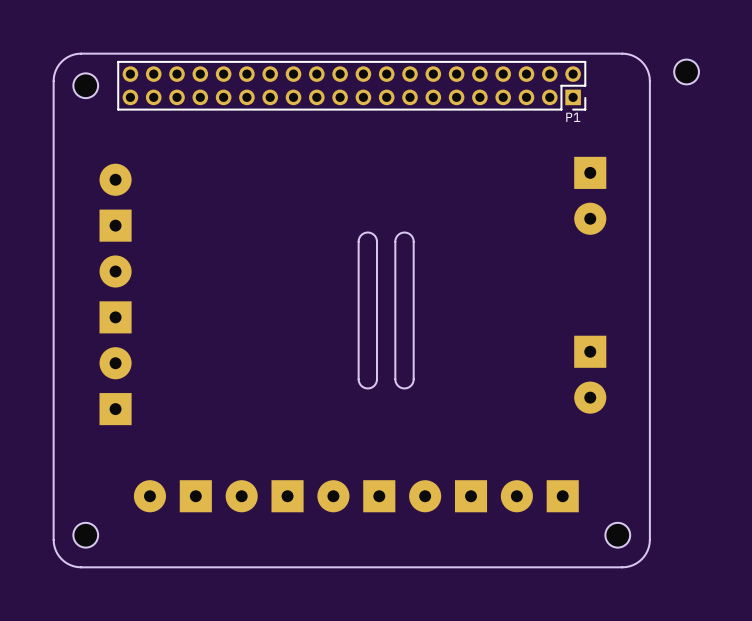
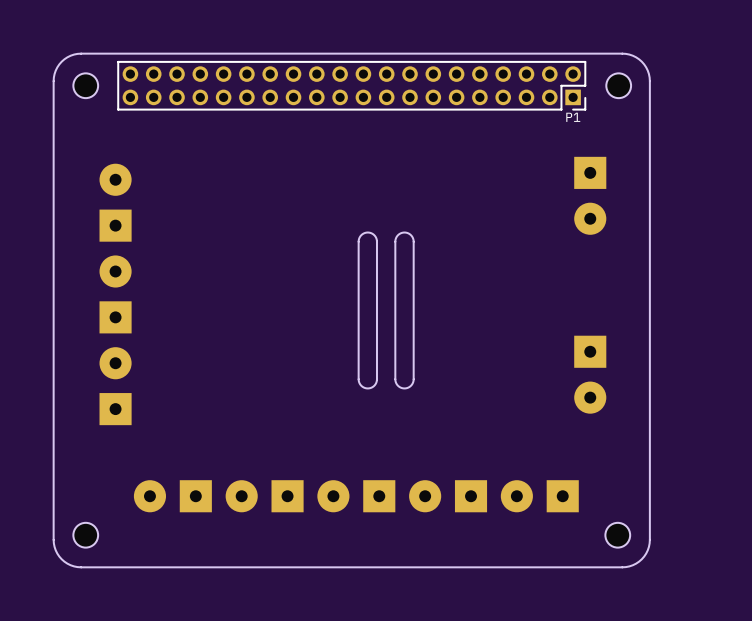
part position: (686, 71) -> (618, 85)

